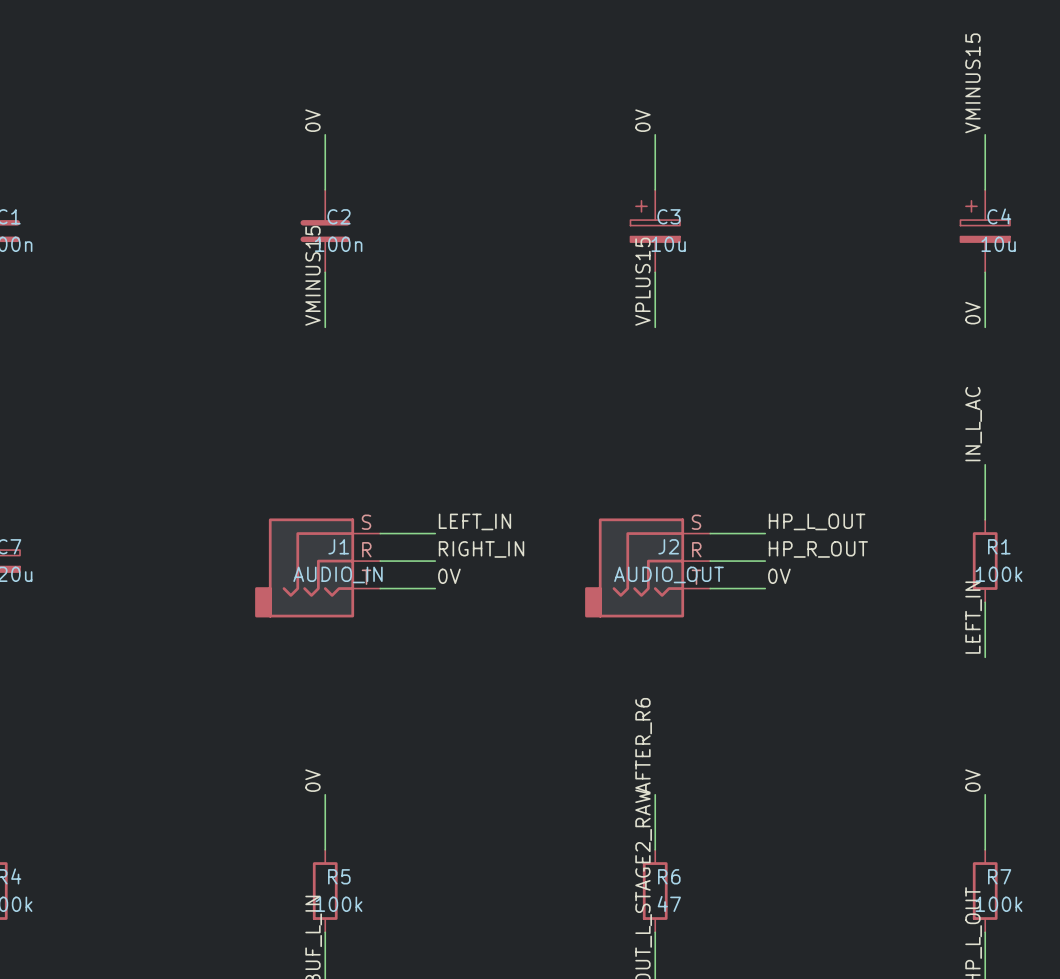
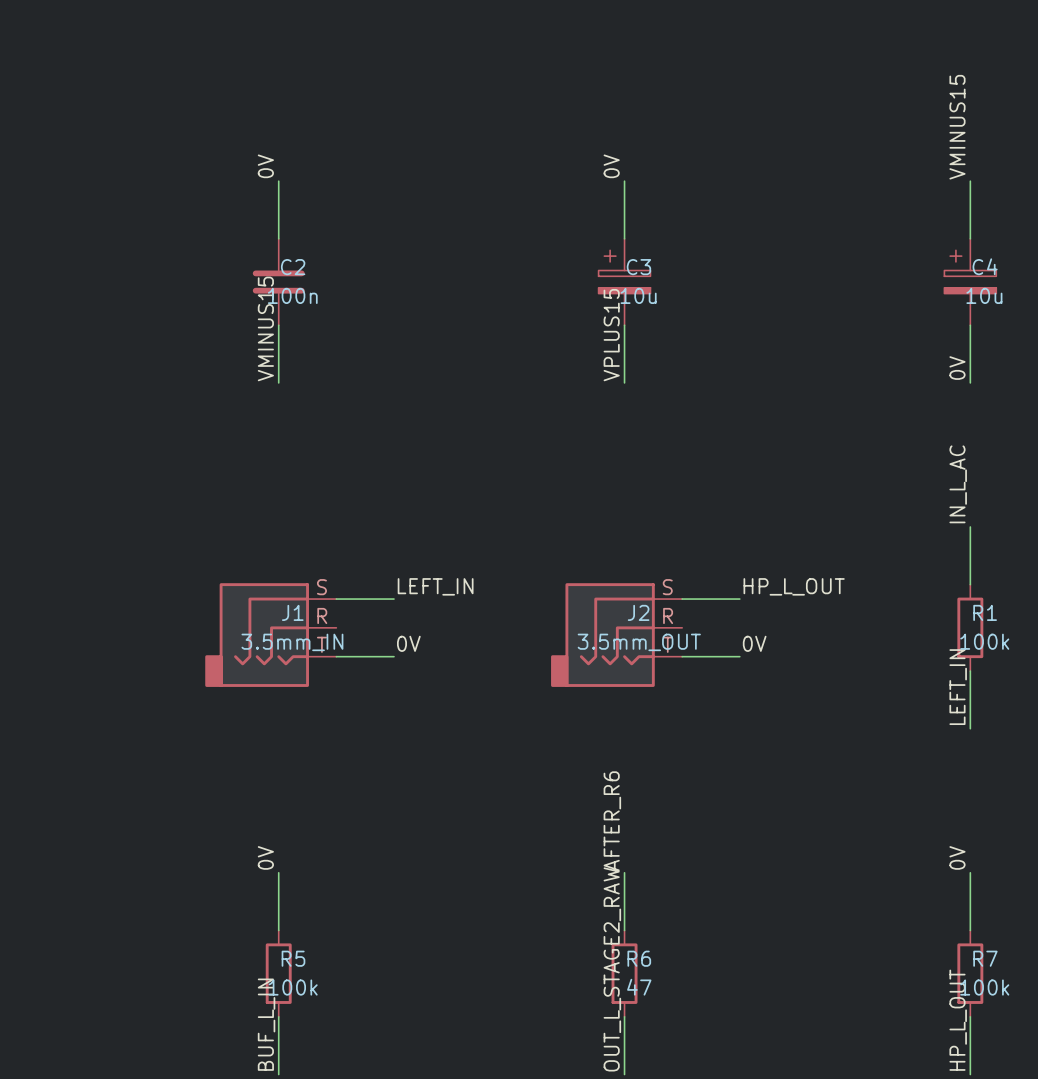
label: RIGHT_IN (481, 549) -> none
label: HP_R_OUT (818, 549) -> none
wire: (380, 561) (435, 561) -> none
wire: (710, 561) (765, 561) -> none
J1 value: AUDIO_IN (338, 574) -> 3.5mm_IN (292, 642)
J2 value: AUDIO_OUT (668, 574) -> 3.5mm_OUT (639, 642)

